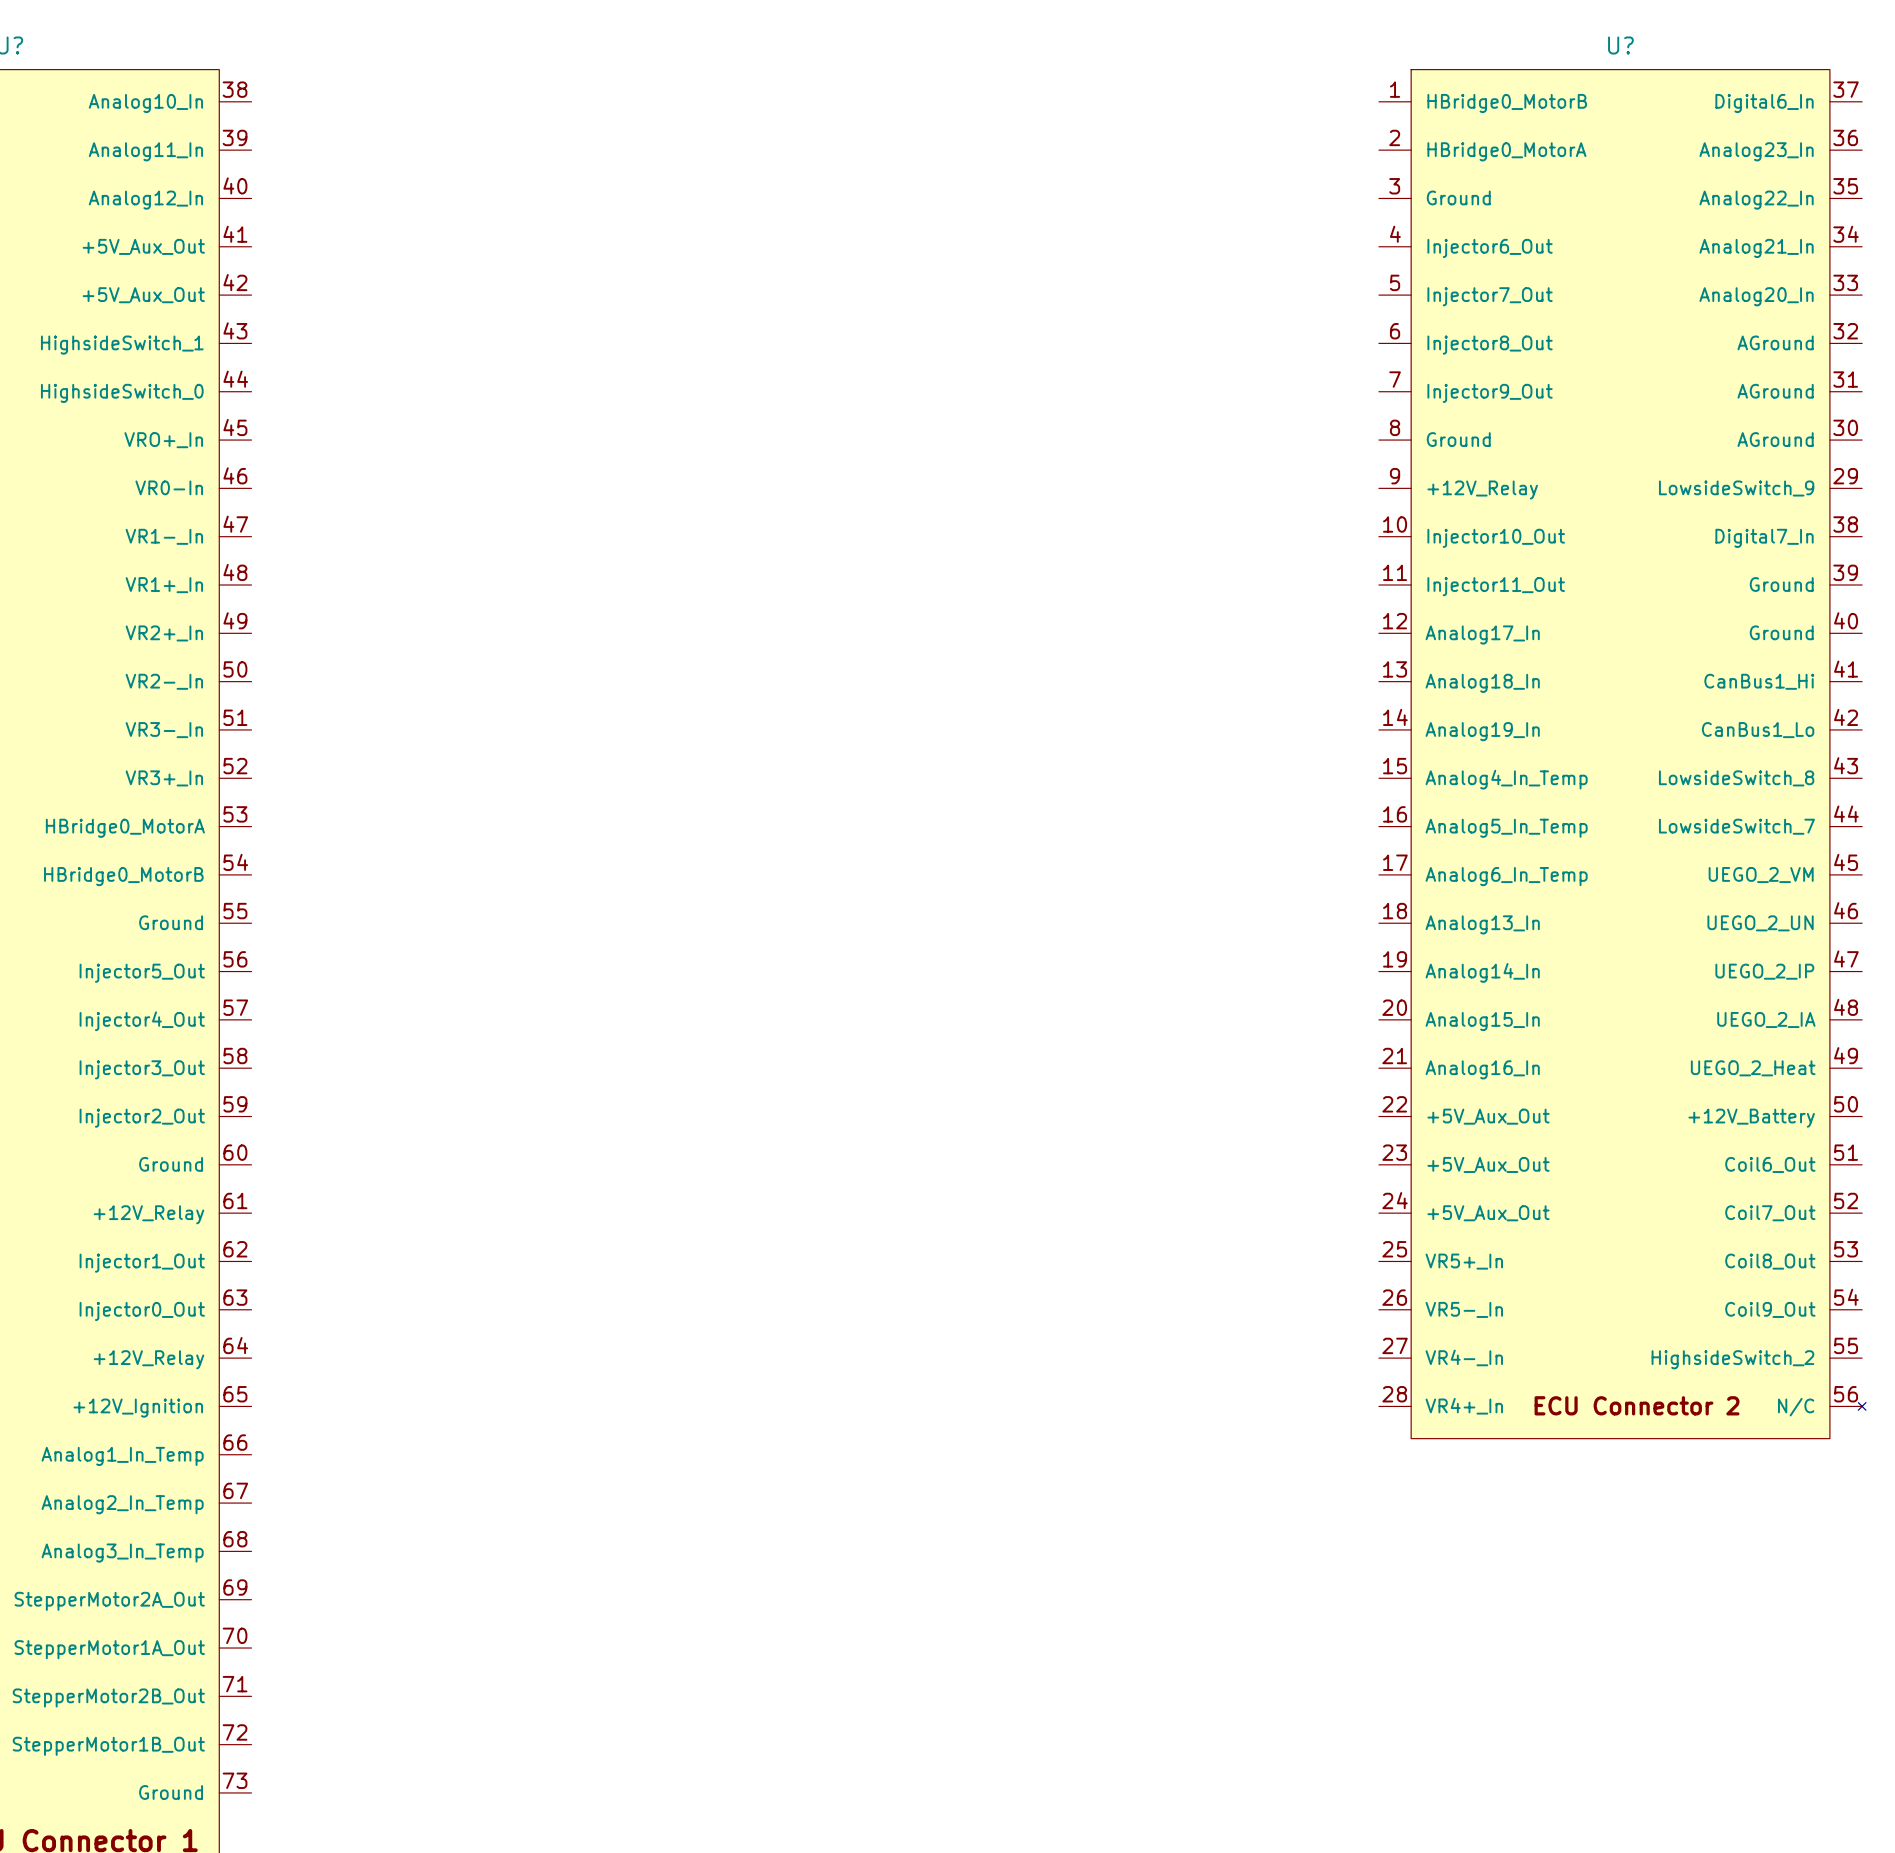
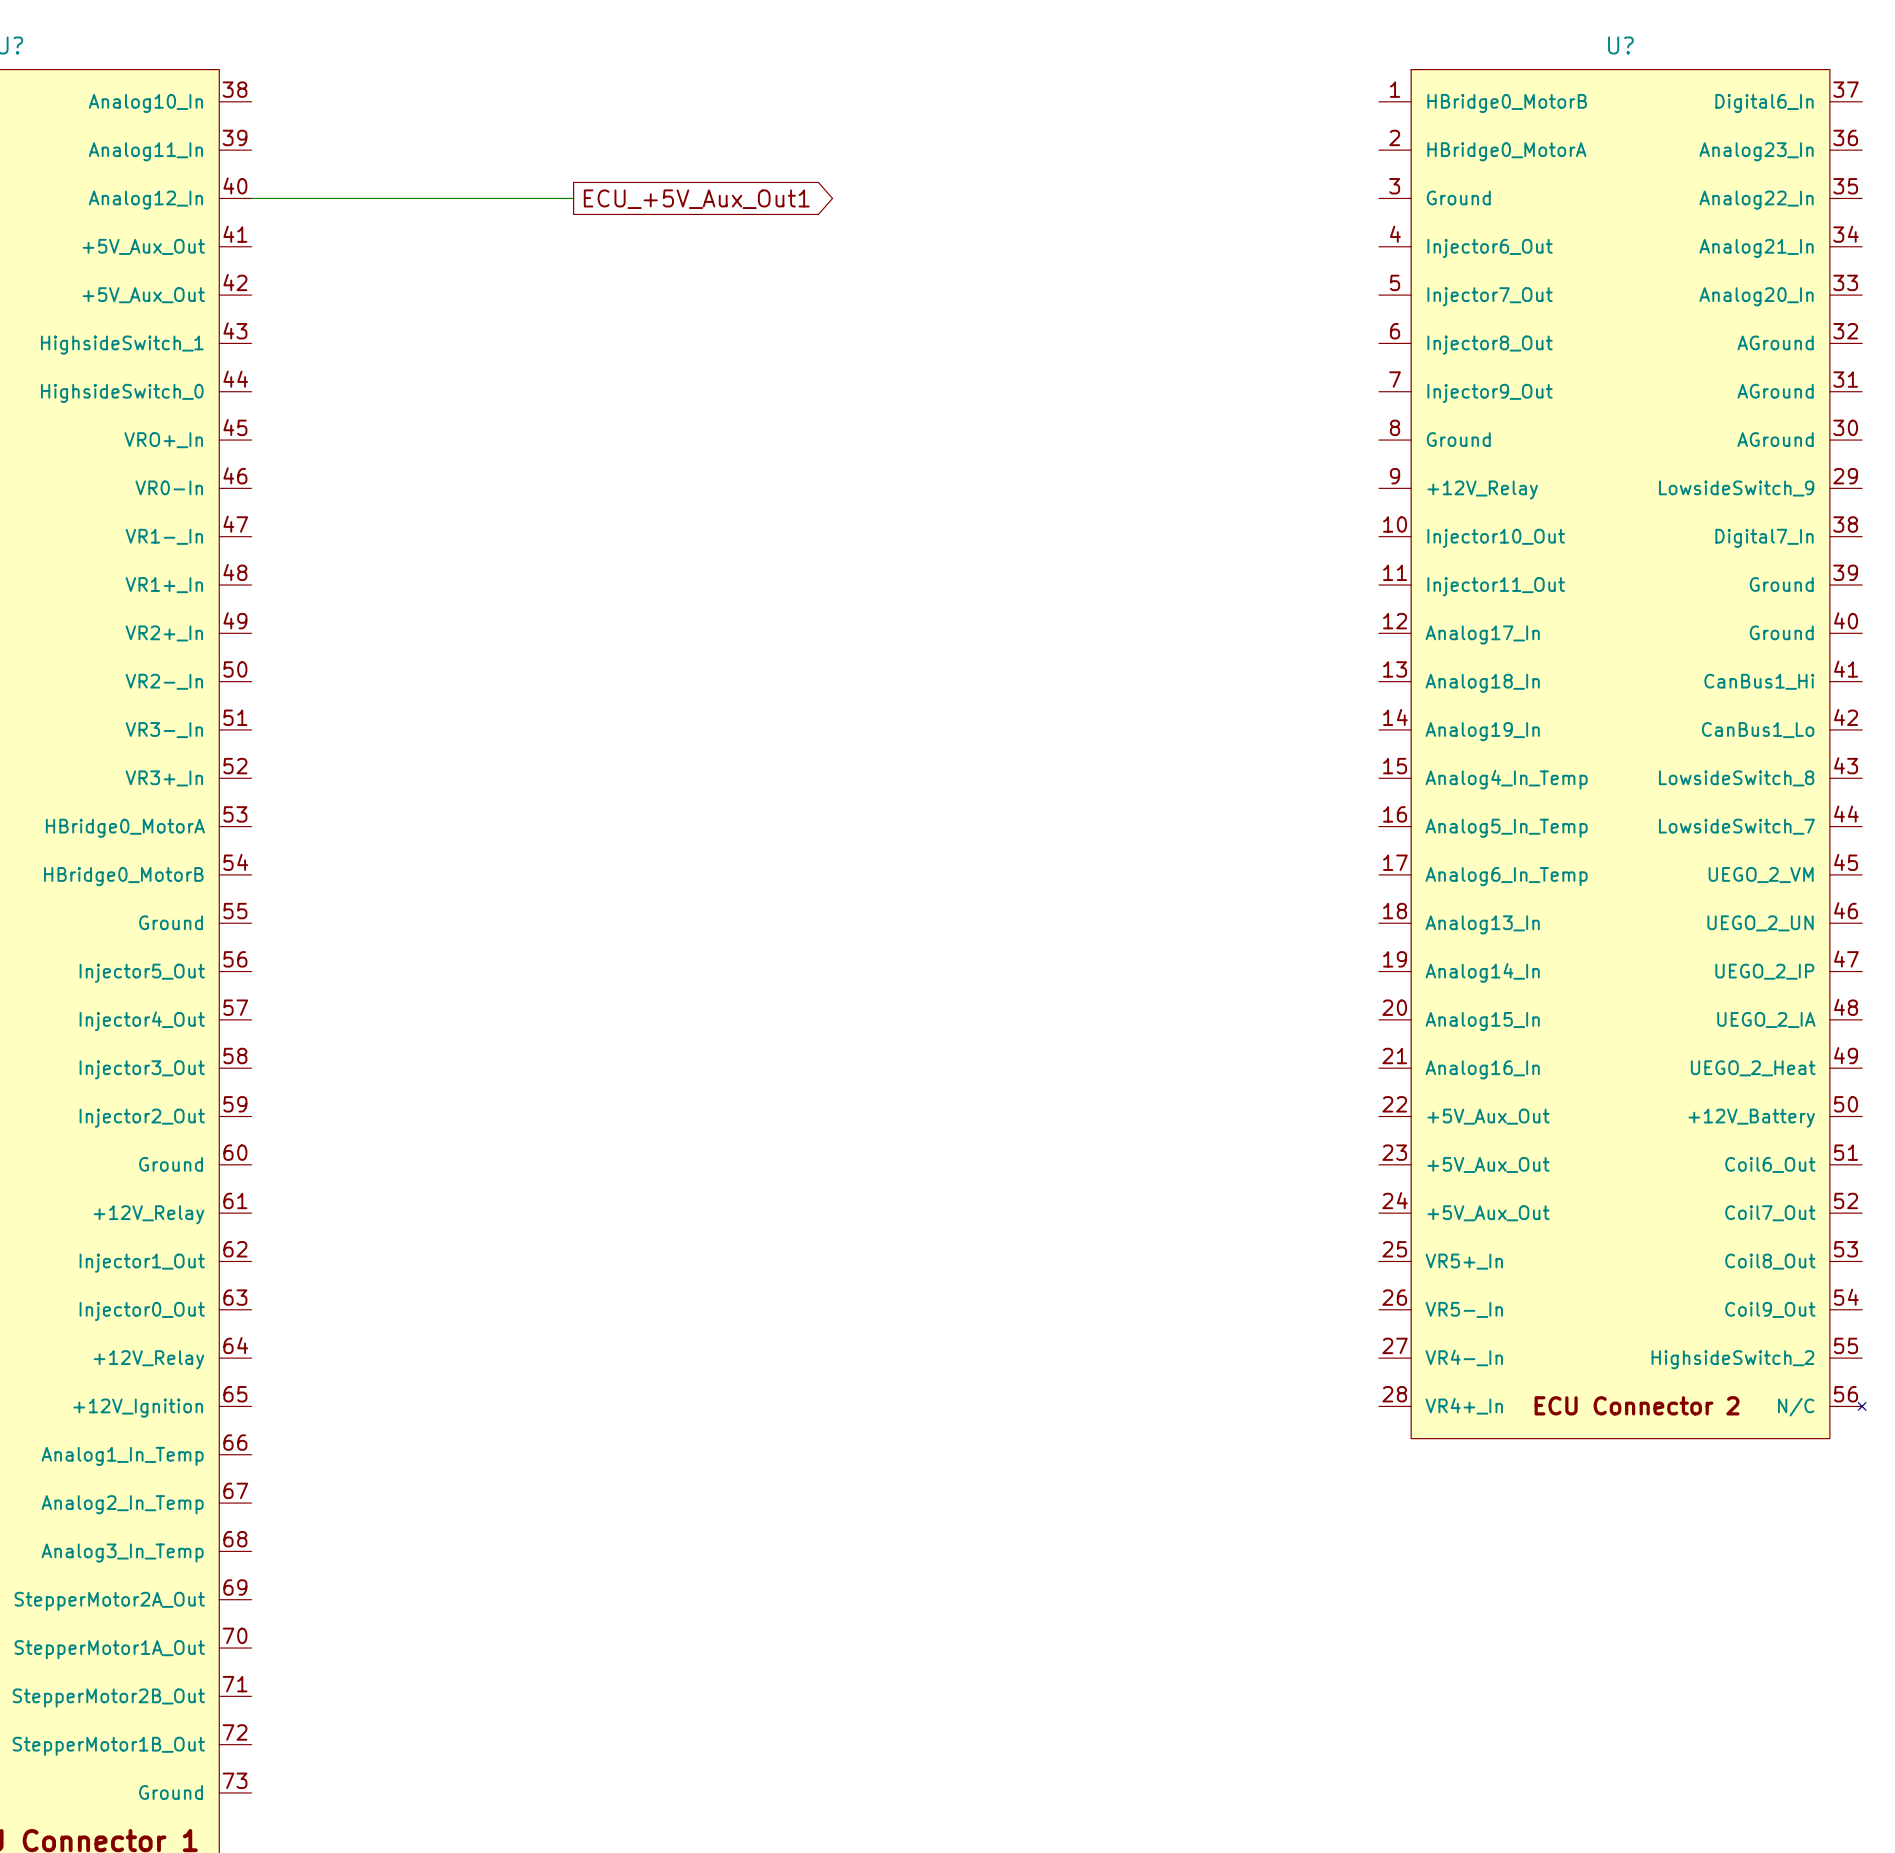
wire: none -> (251, 198) (573, 198)
global label: none -> ECU_+5V_Aux_Out1 (696, 199)

